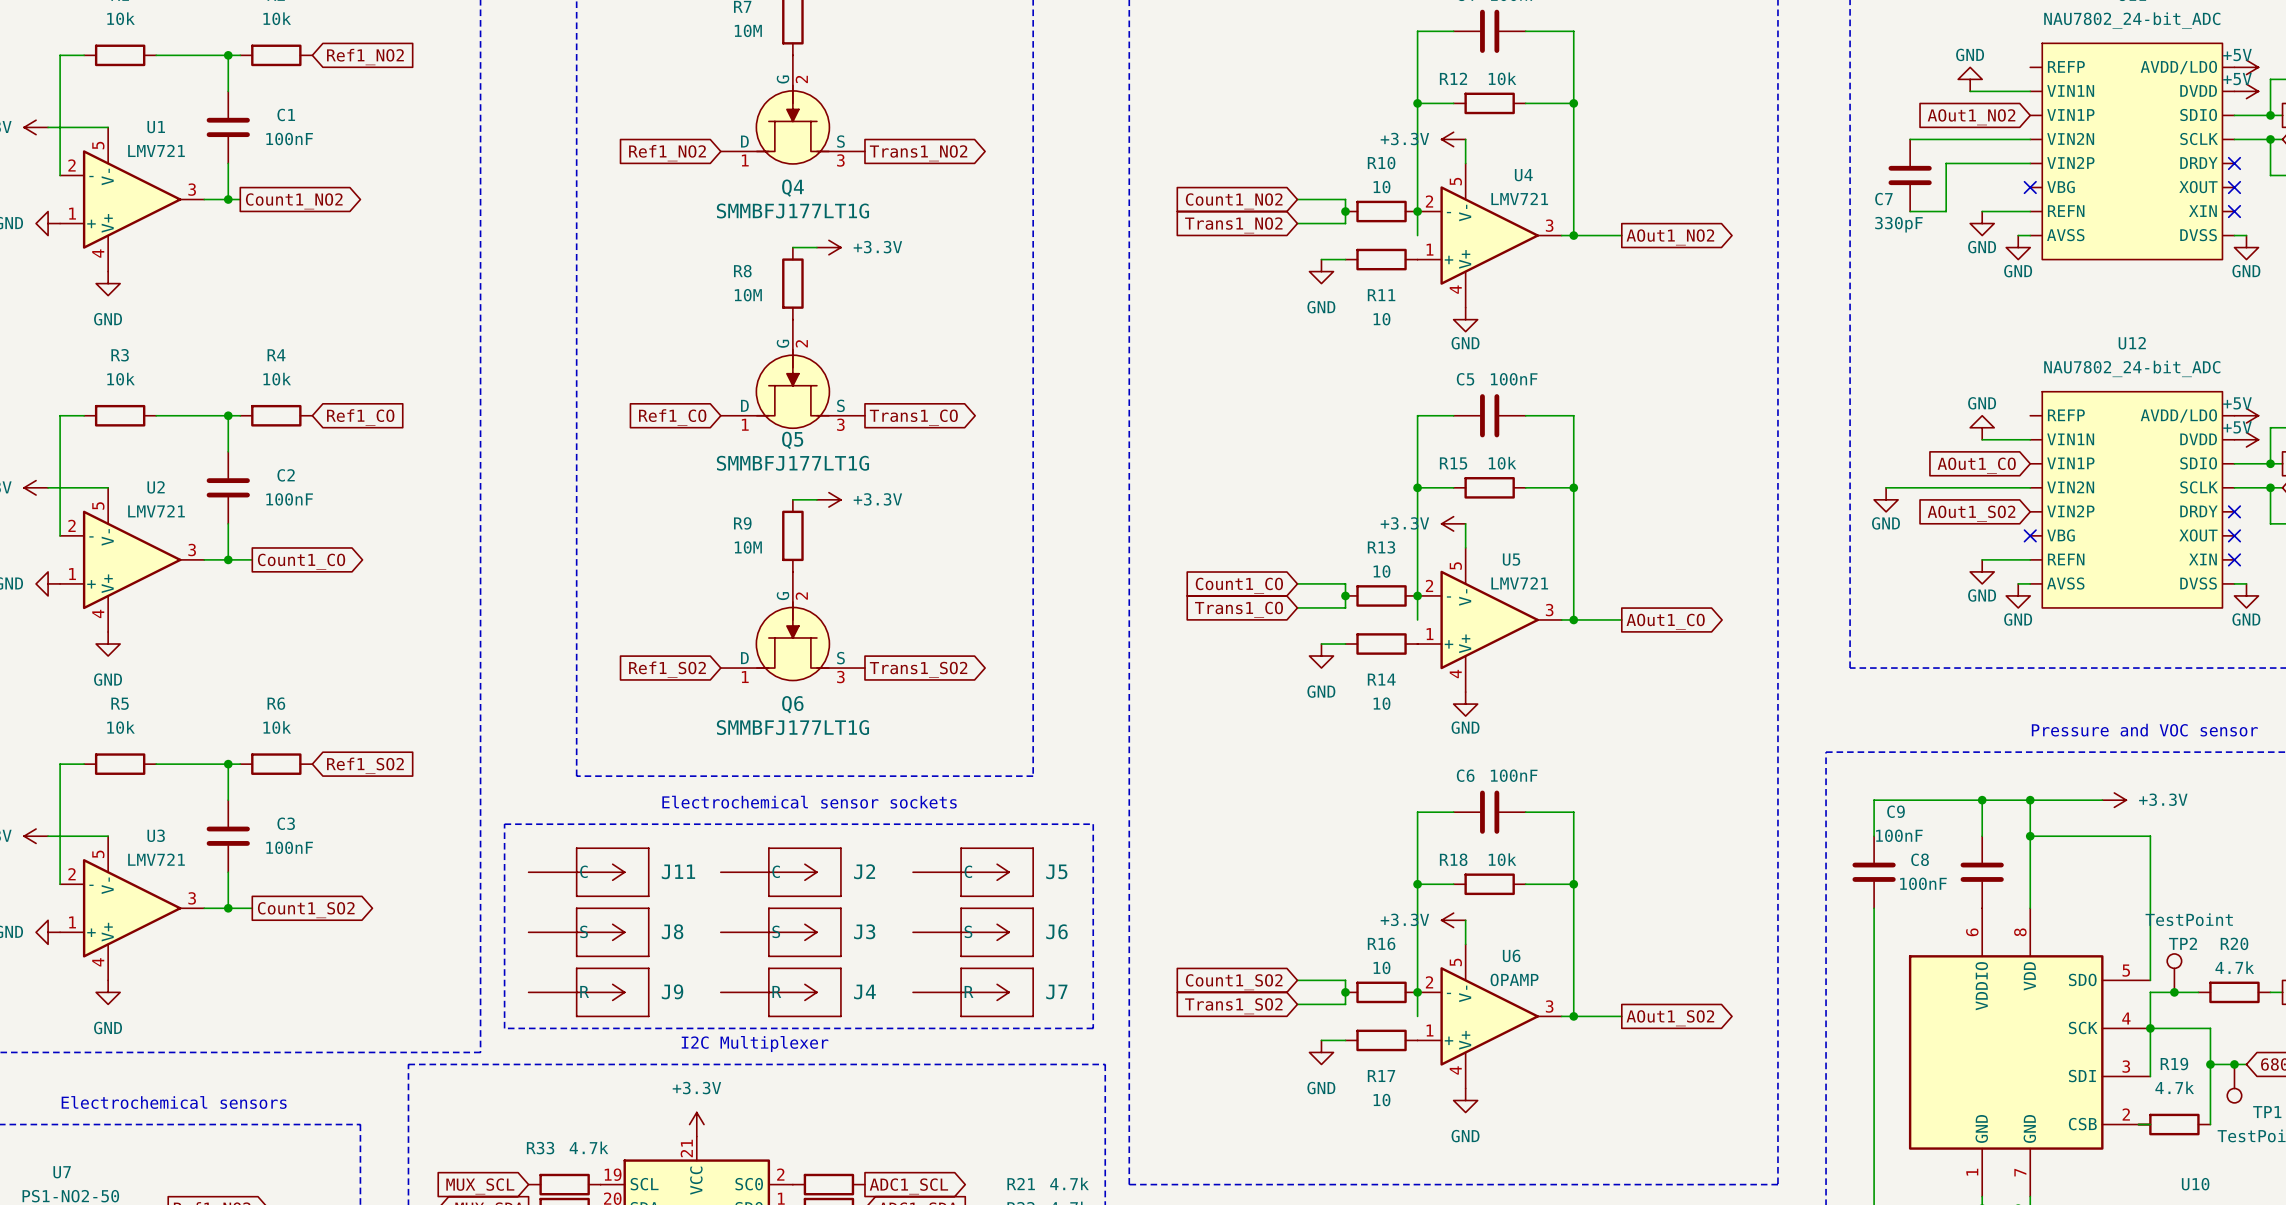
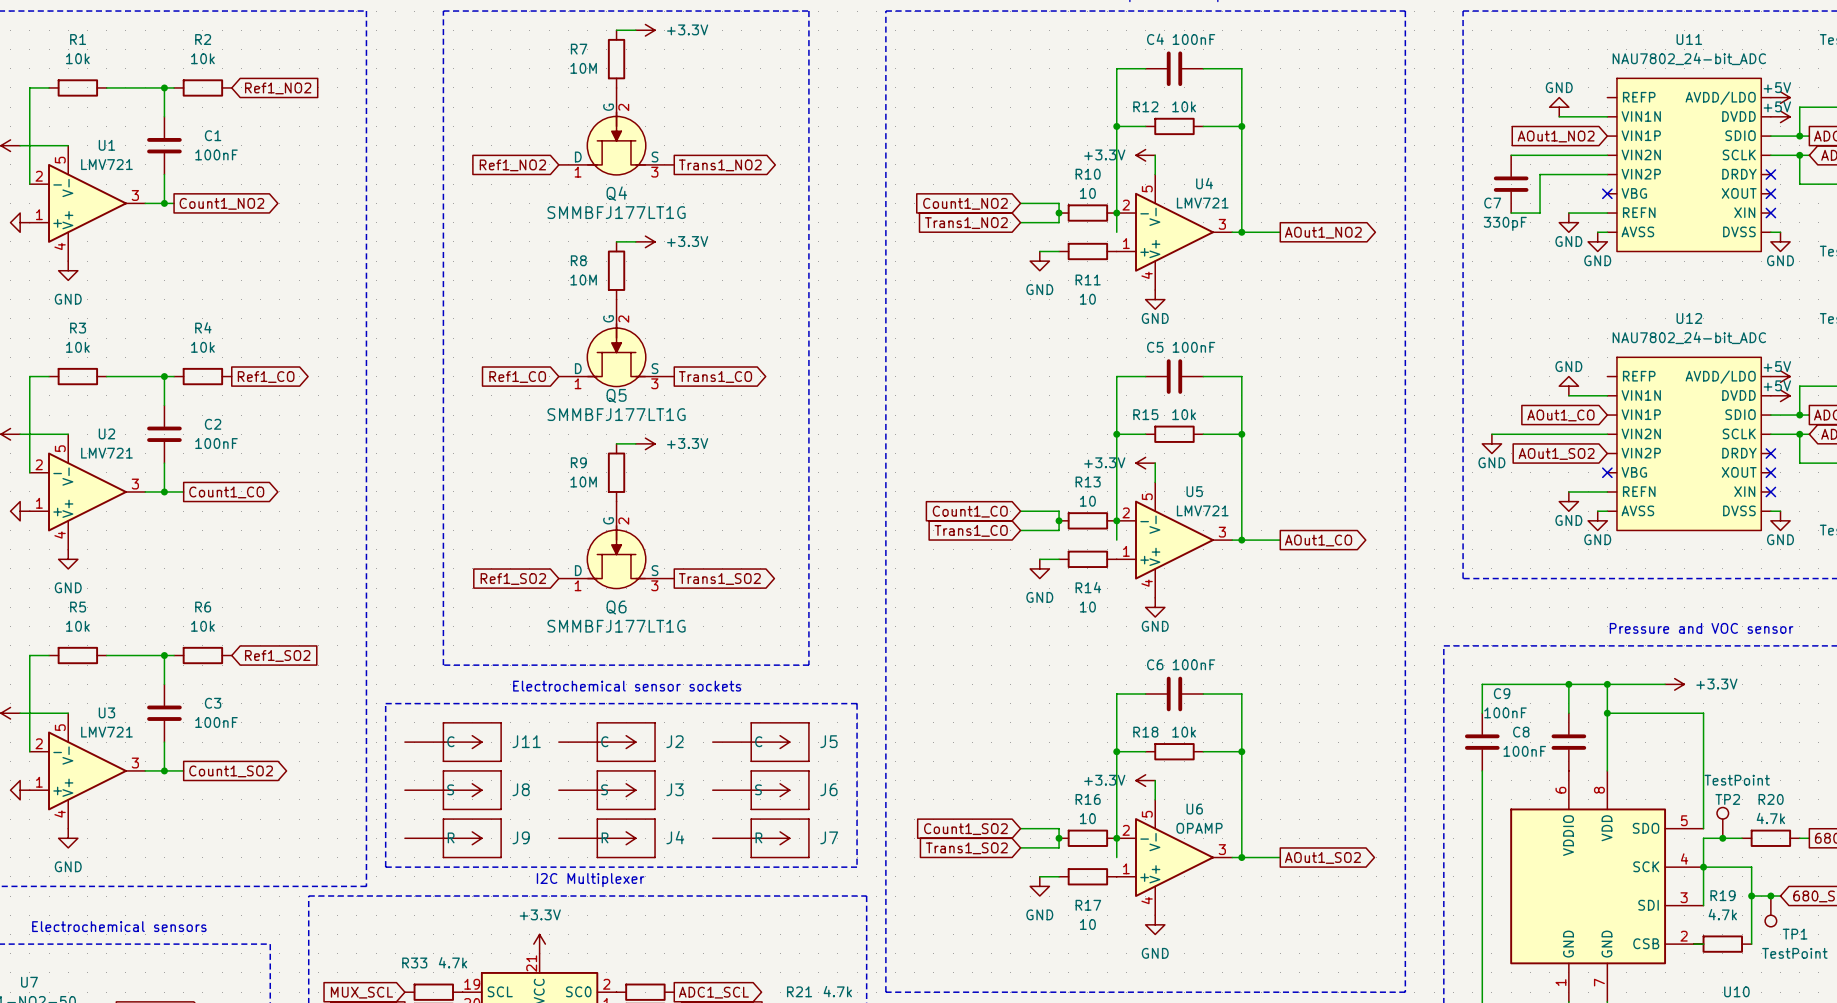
global label shape: input (360, 417) -> output (266, 377)

